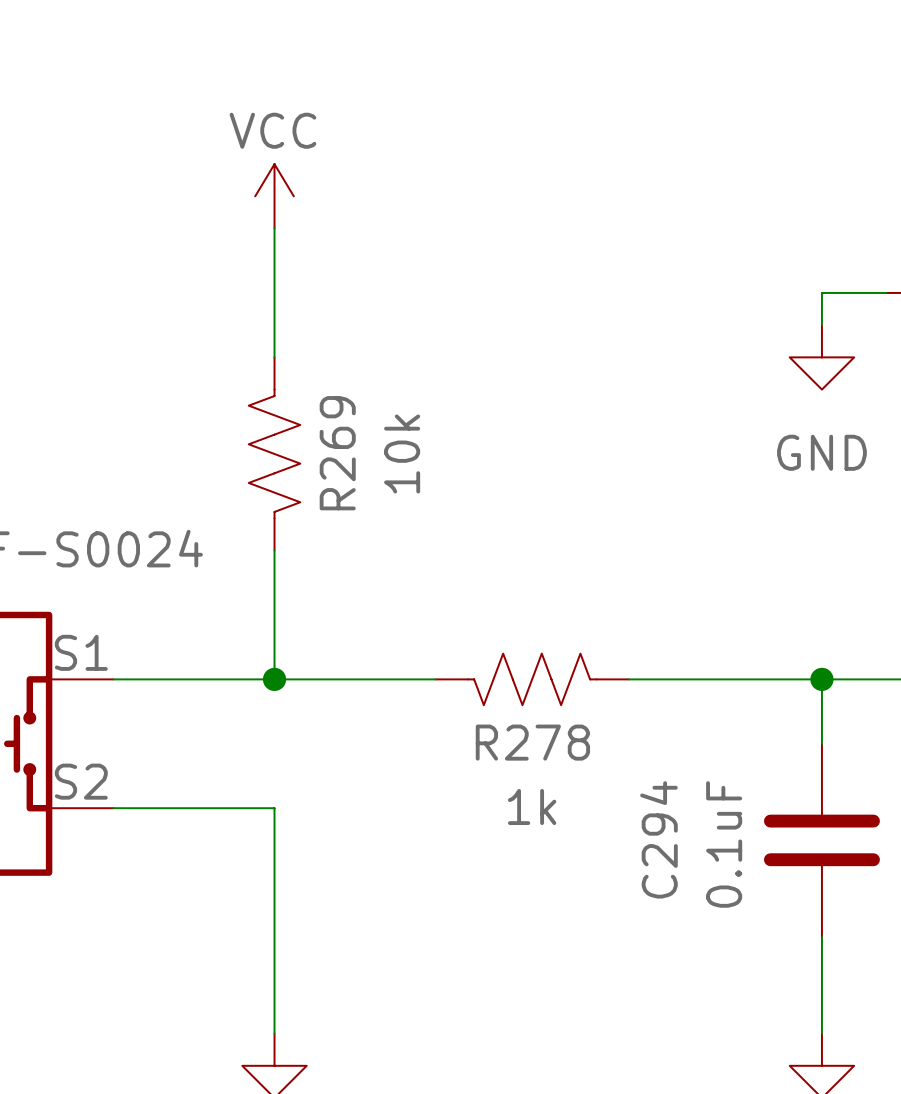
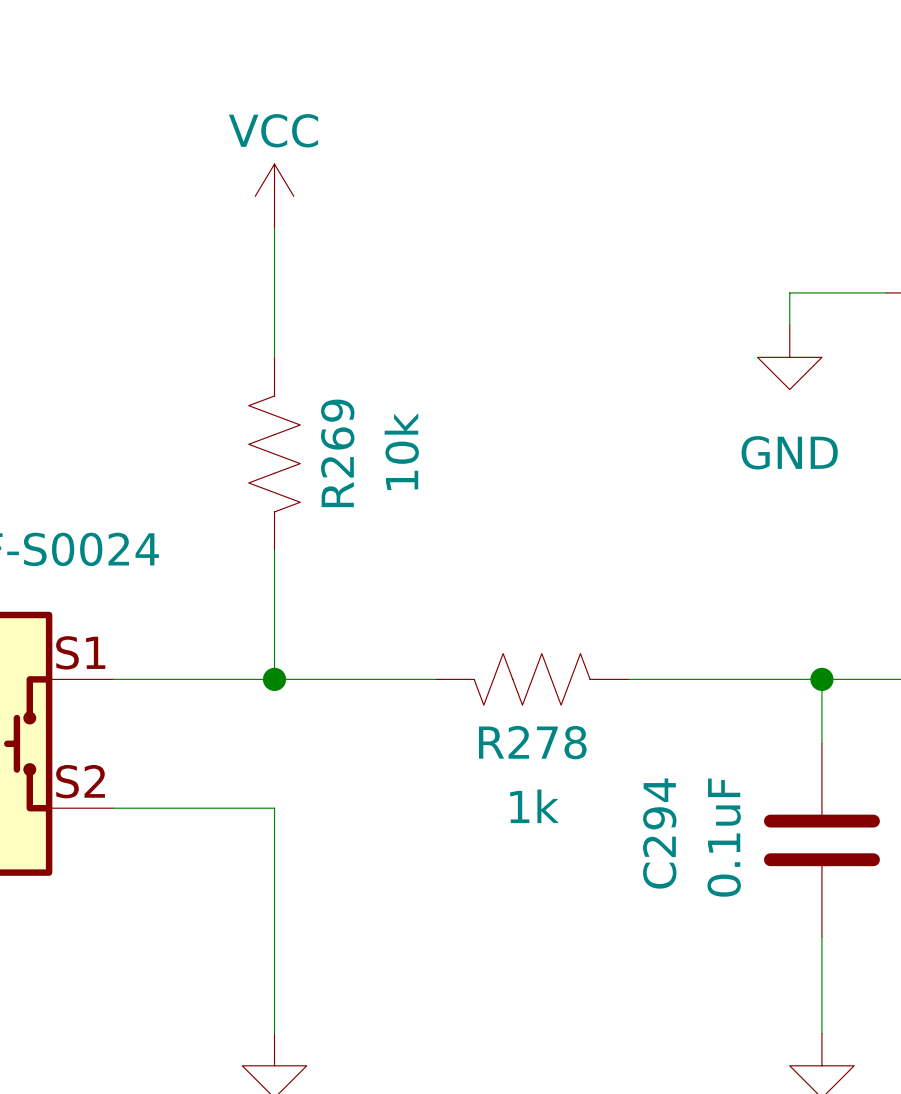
wire: (821, 292) (821, 325) -> (821, 292) (789, 292) (789, 325)
power symbol position: GND (821, 357) -> GND (789, 357)

